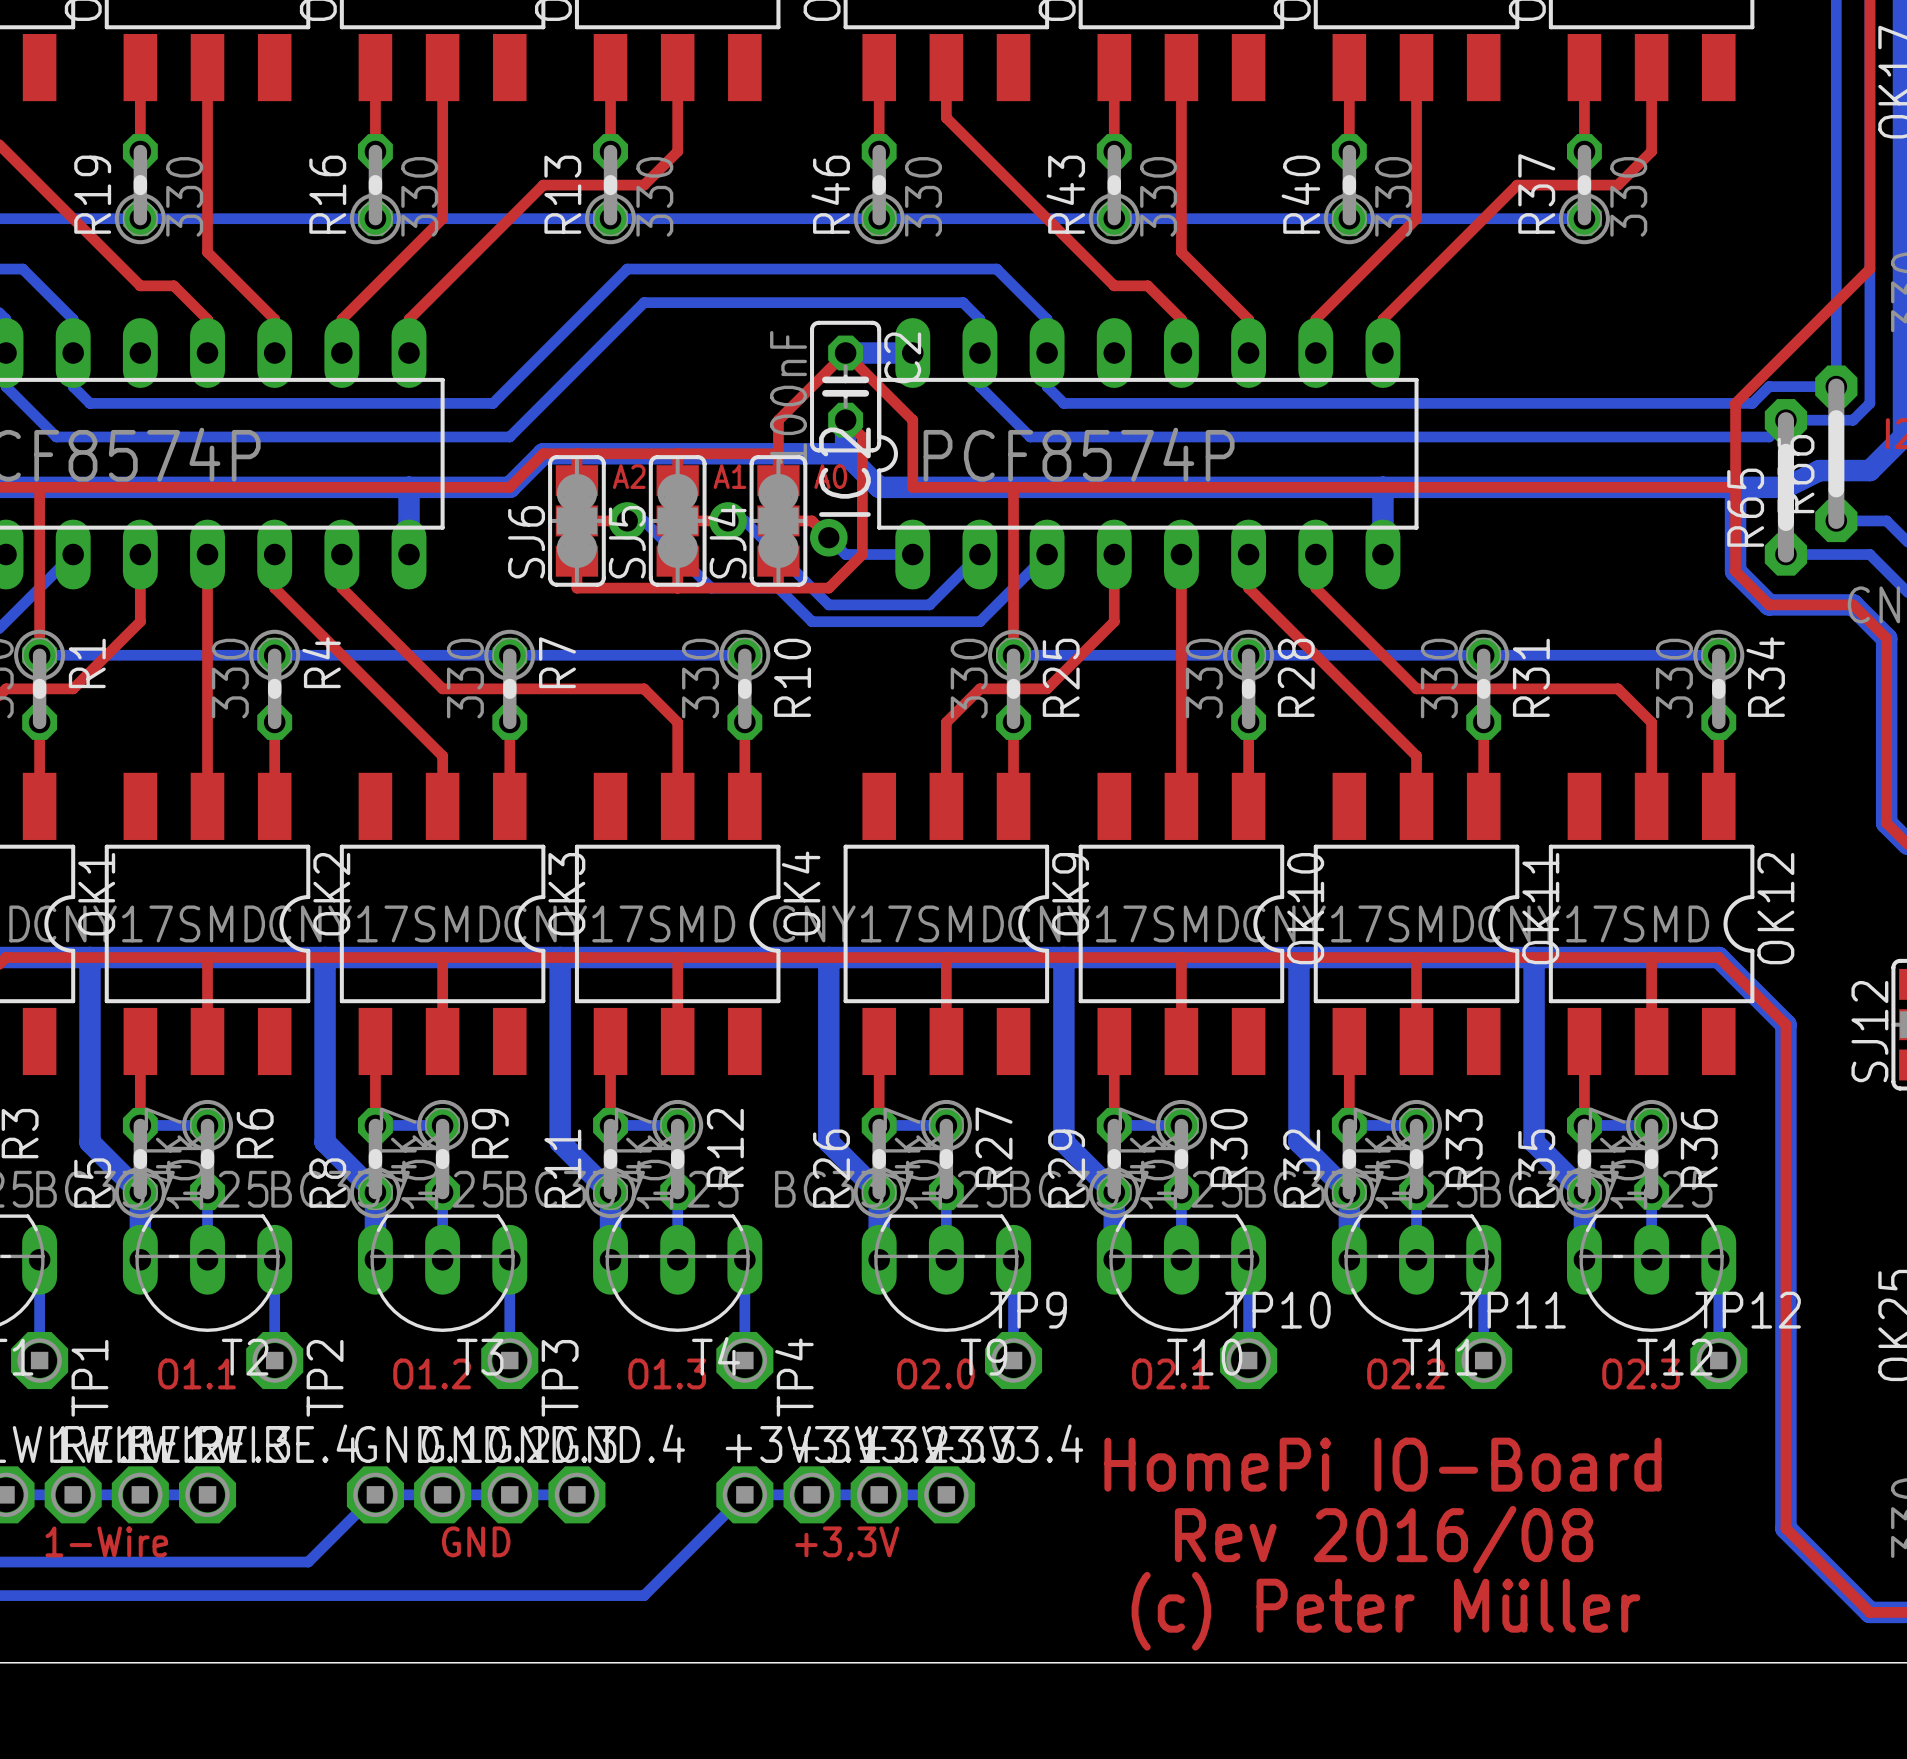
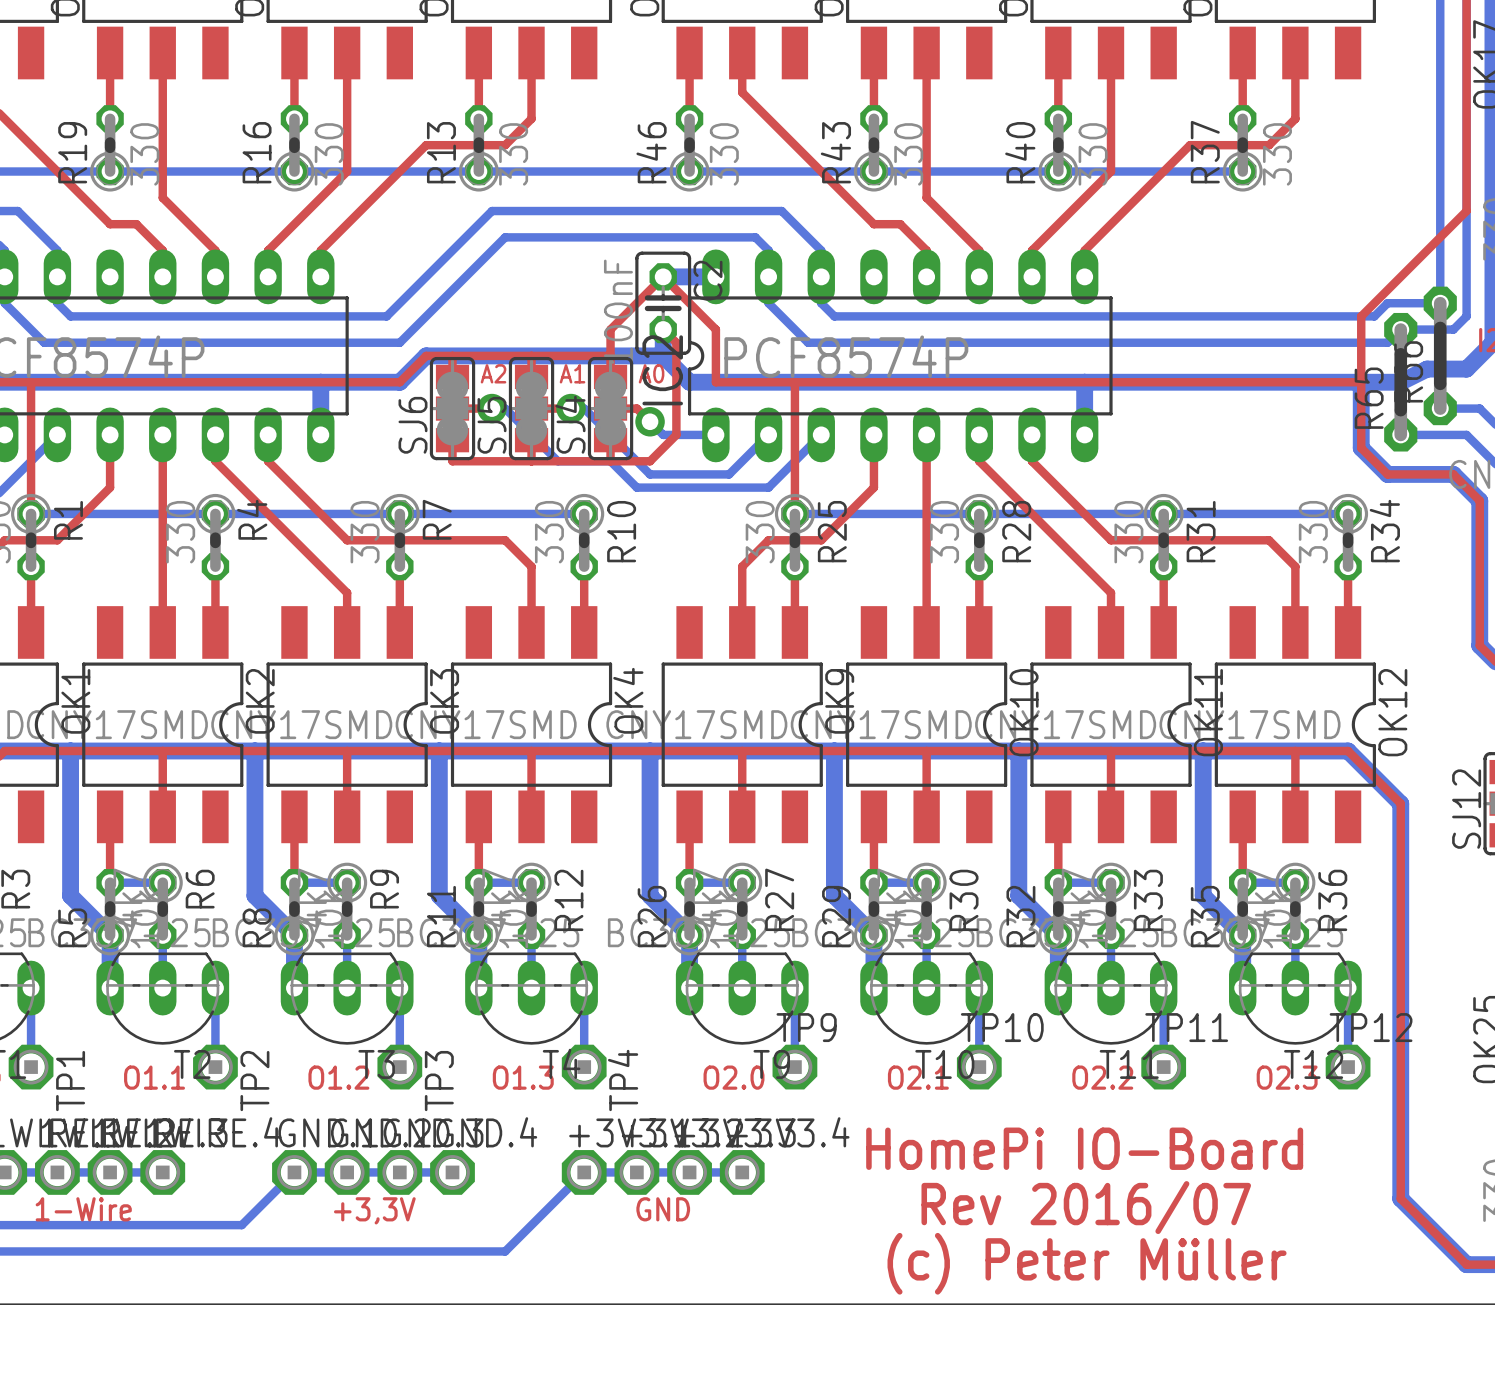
text: Rev 2016/08 (1383, 1539) -> Rev 2016/07 (1086, 1207)
text: GND (476, 1541) -> +3,3V (374, 1210)
text: +3,3V (847, 1543) -> GND (663, 1209)

